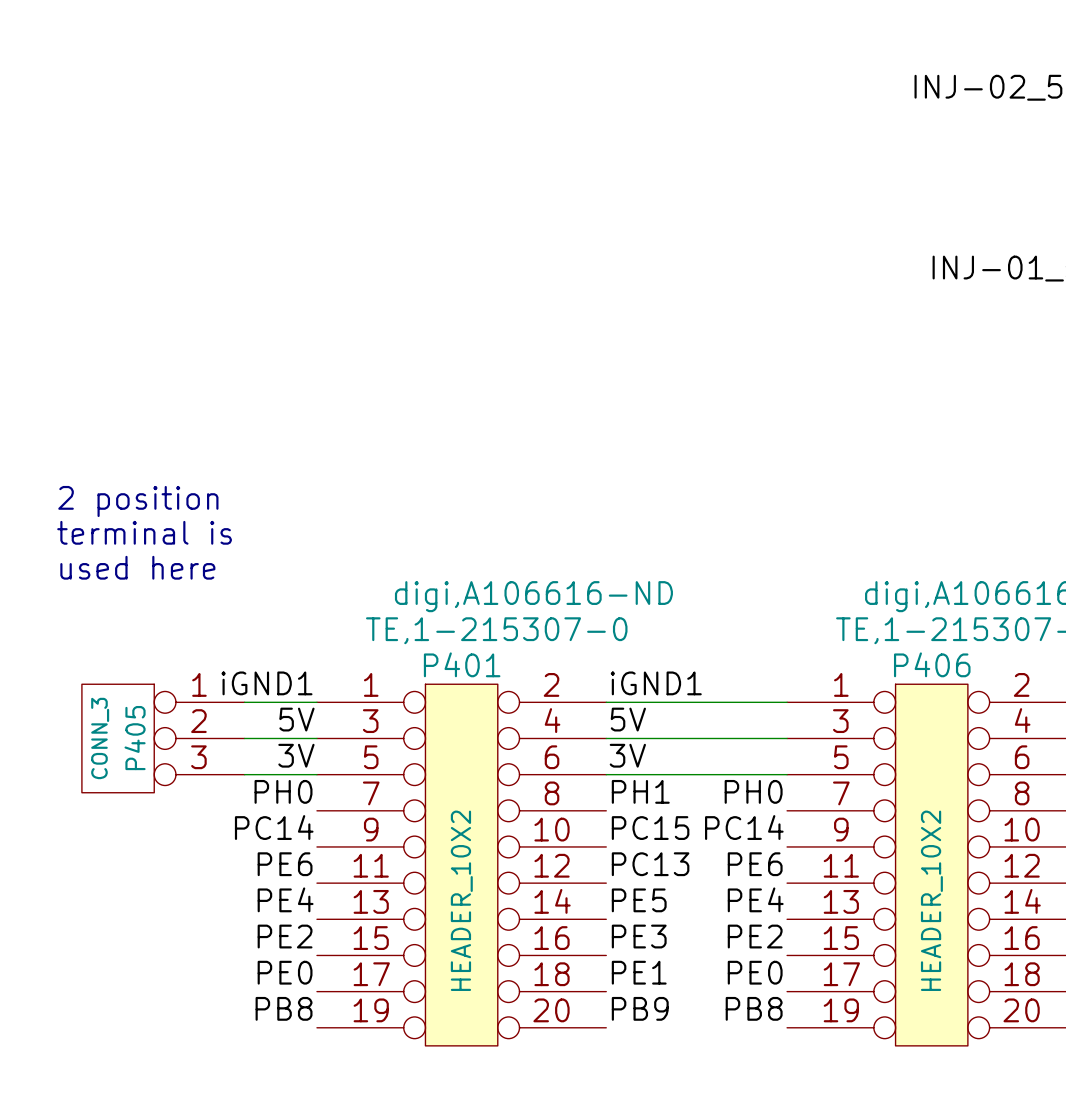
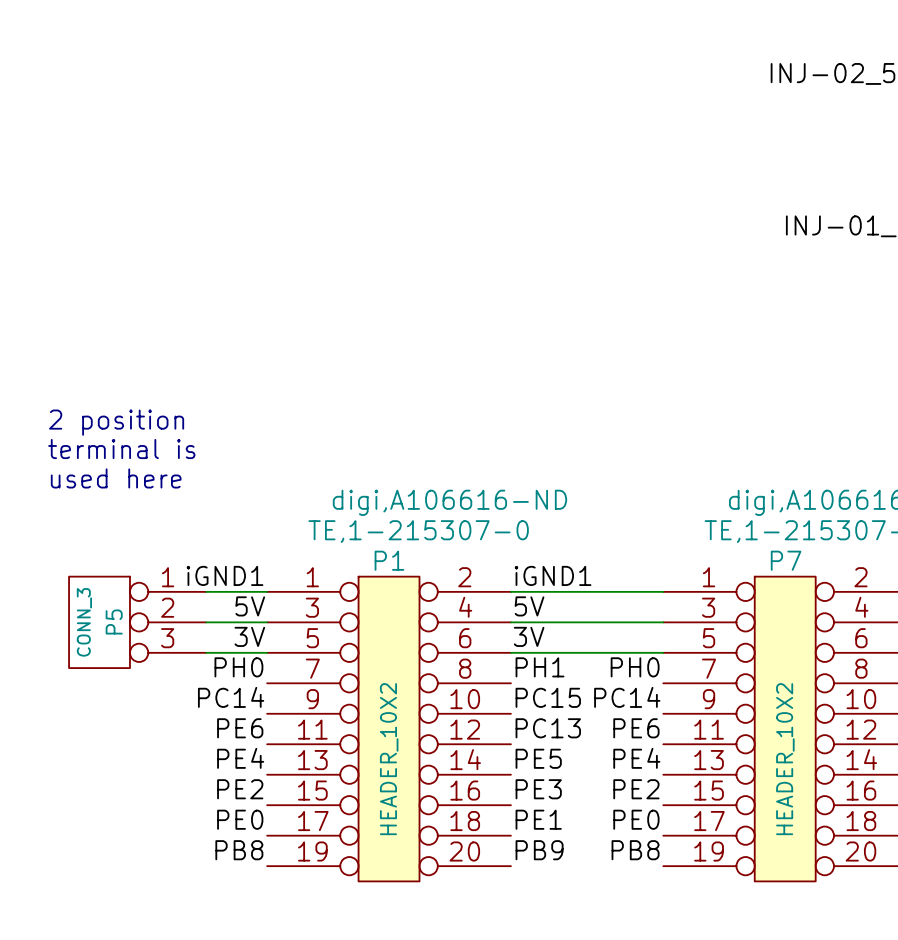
P401 name: P401 (462, 664) -> P1 (389, 560)
P406 name: P406 (932, 664) -> P7 (786, 560)
P405 name: P405 (135, 738) -> P5 (114, 621)

